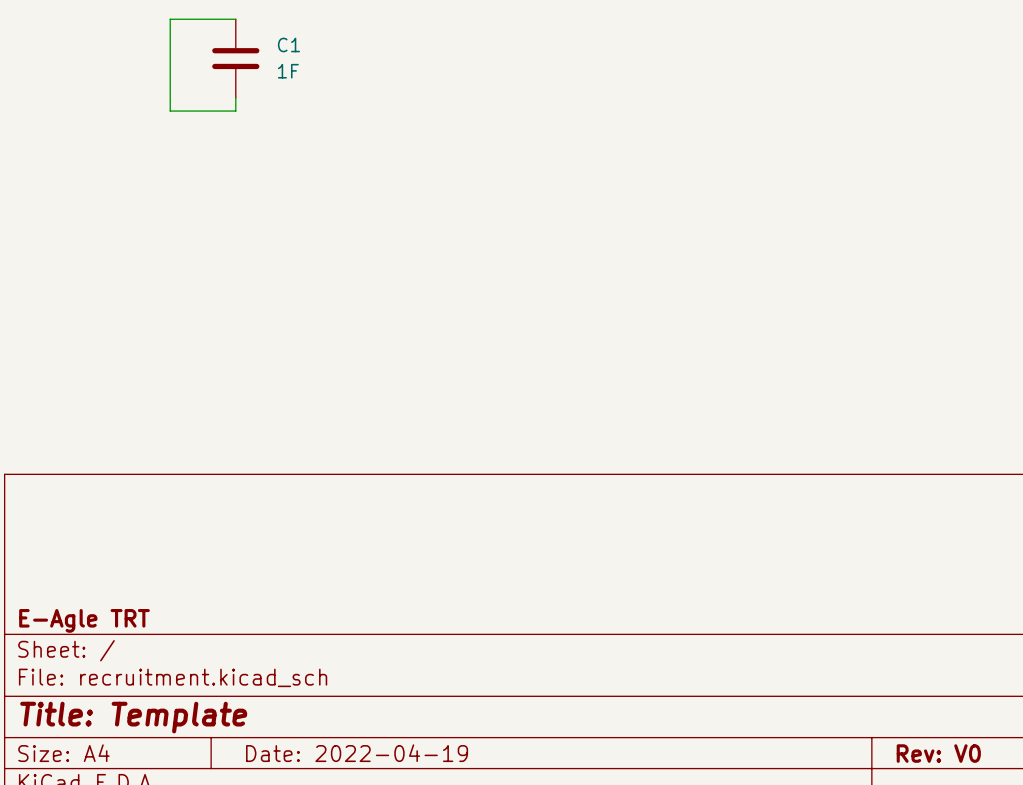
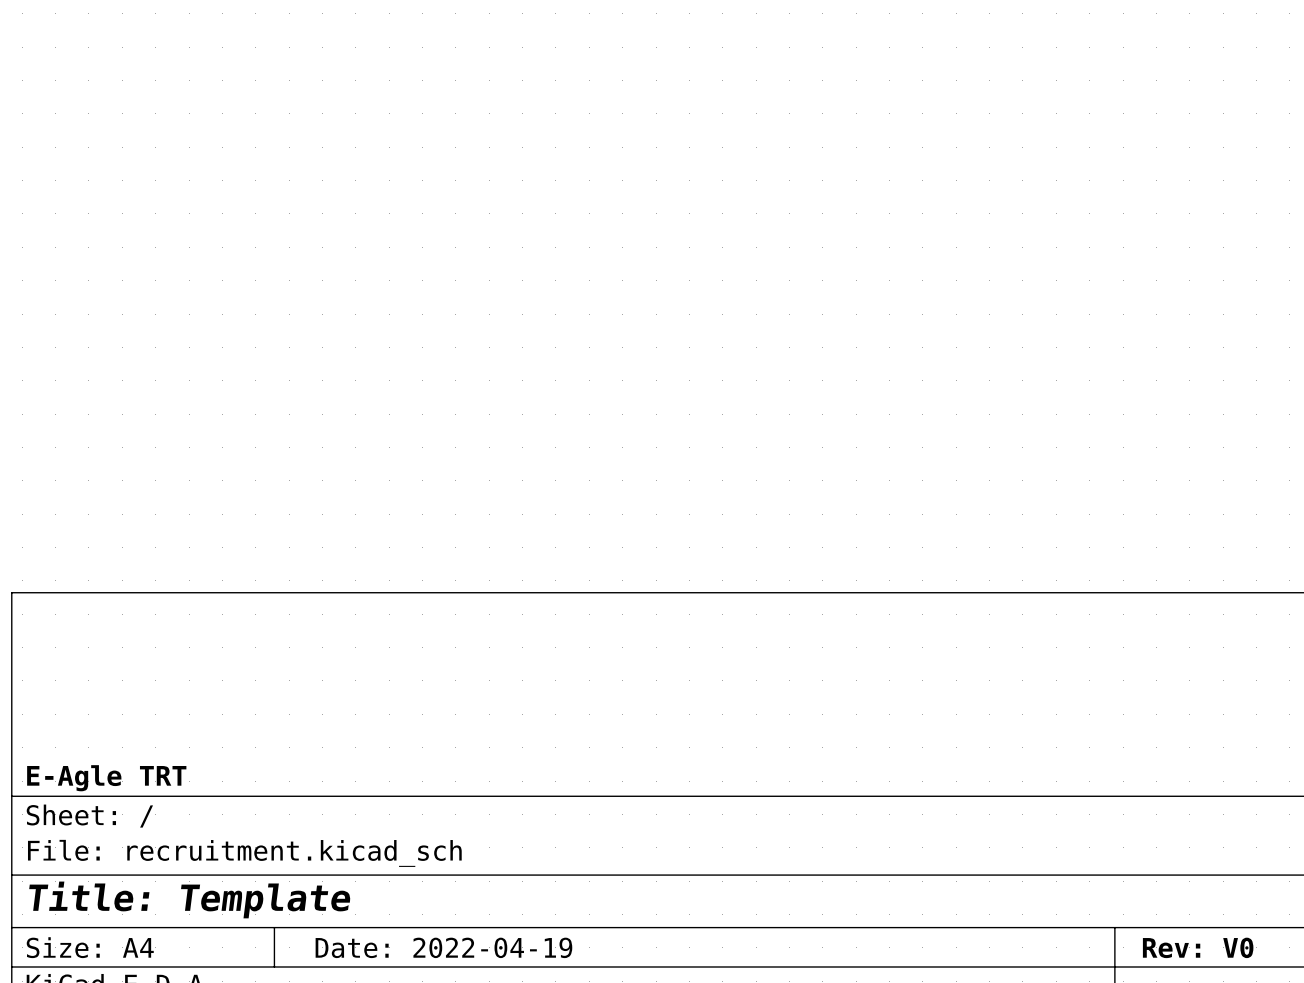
wire: (235, 19) (170, 19) (170, 111) (235, 111) (235, 97) -> none
C1: 1F (235, 58) -> none

